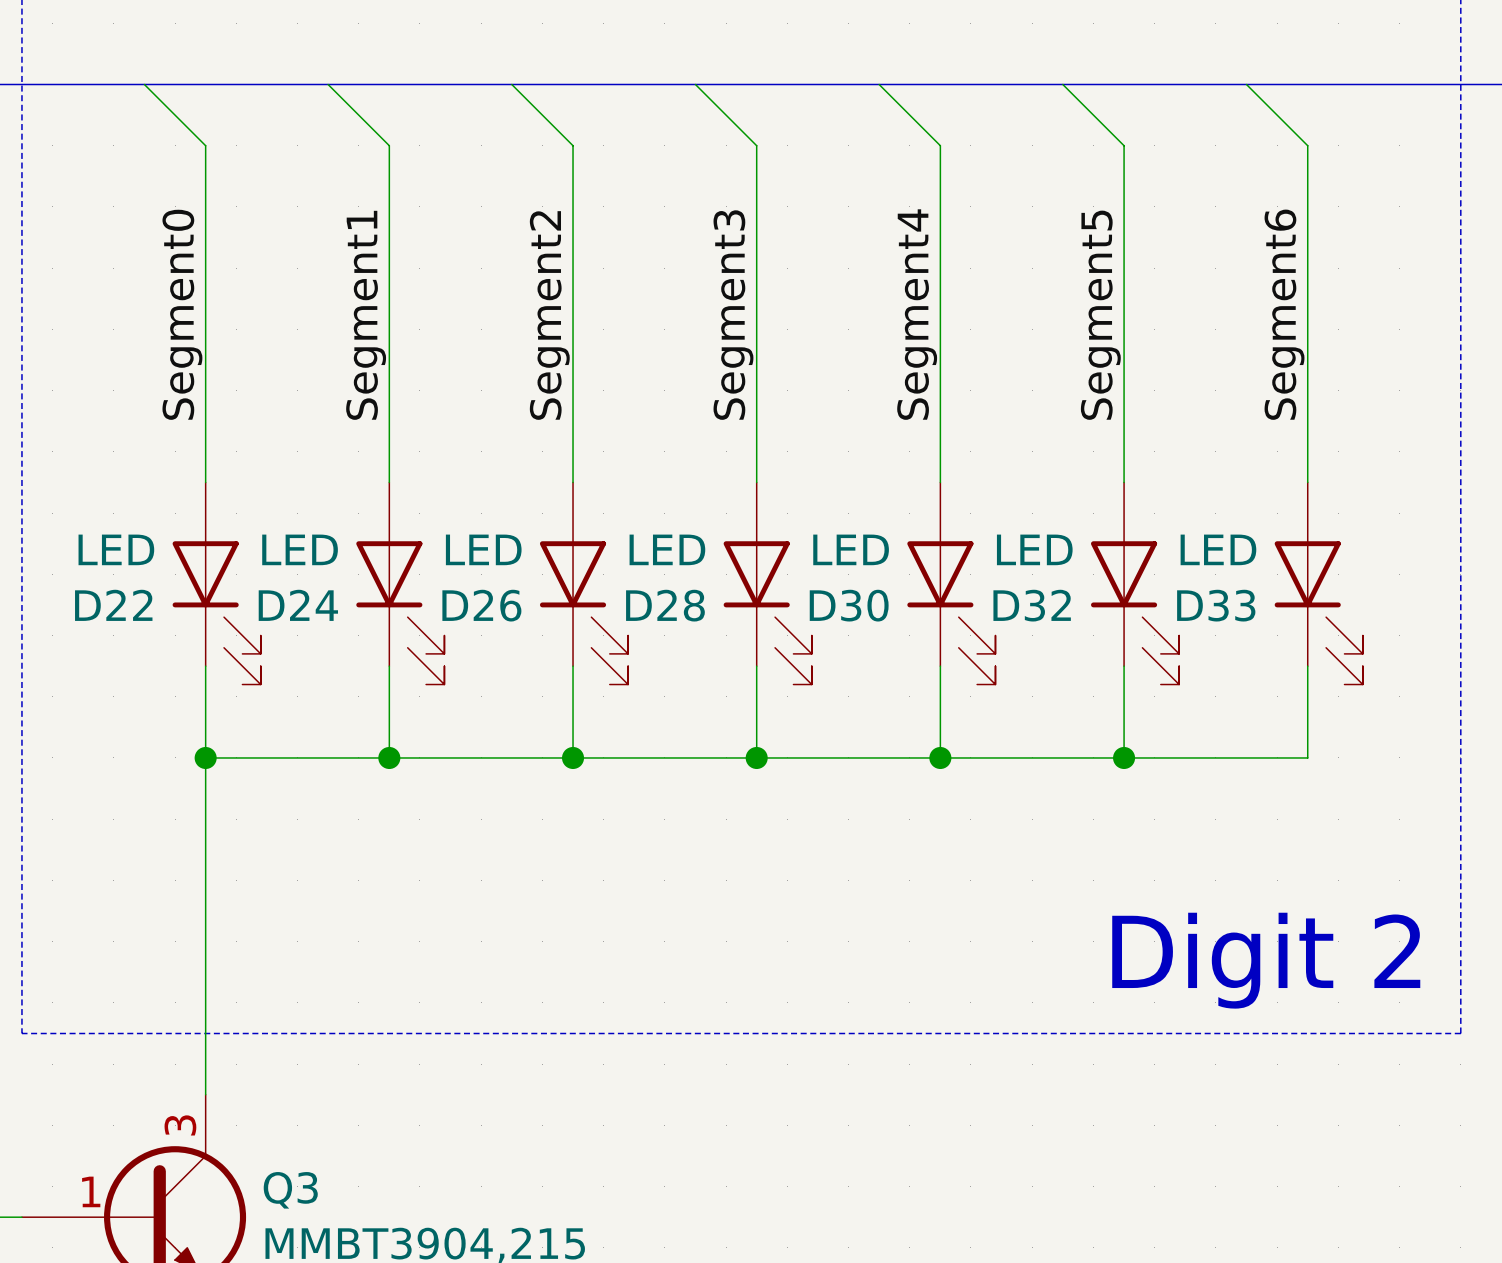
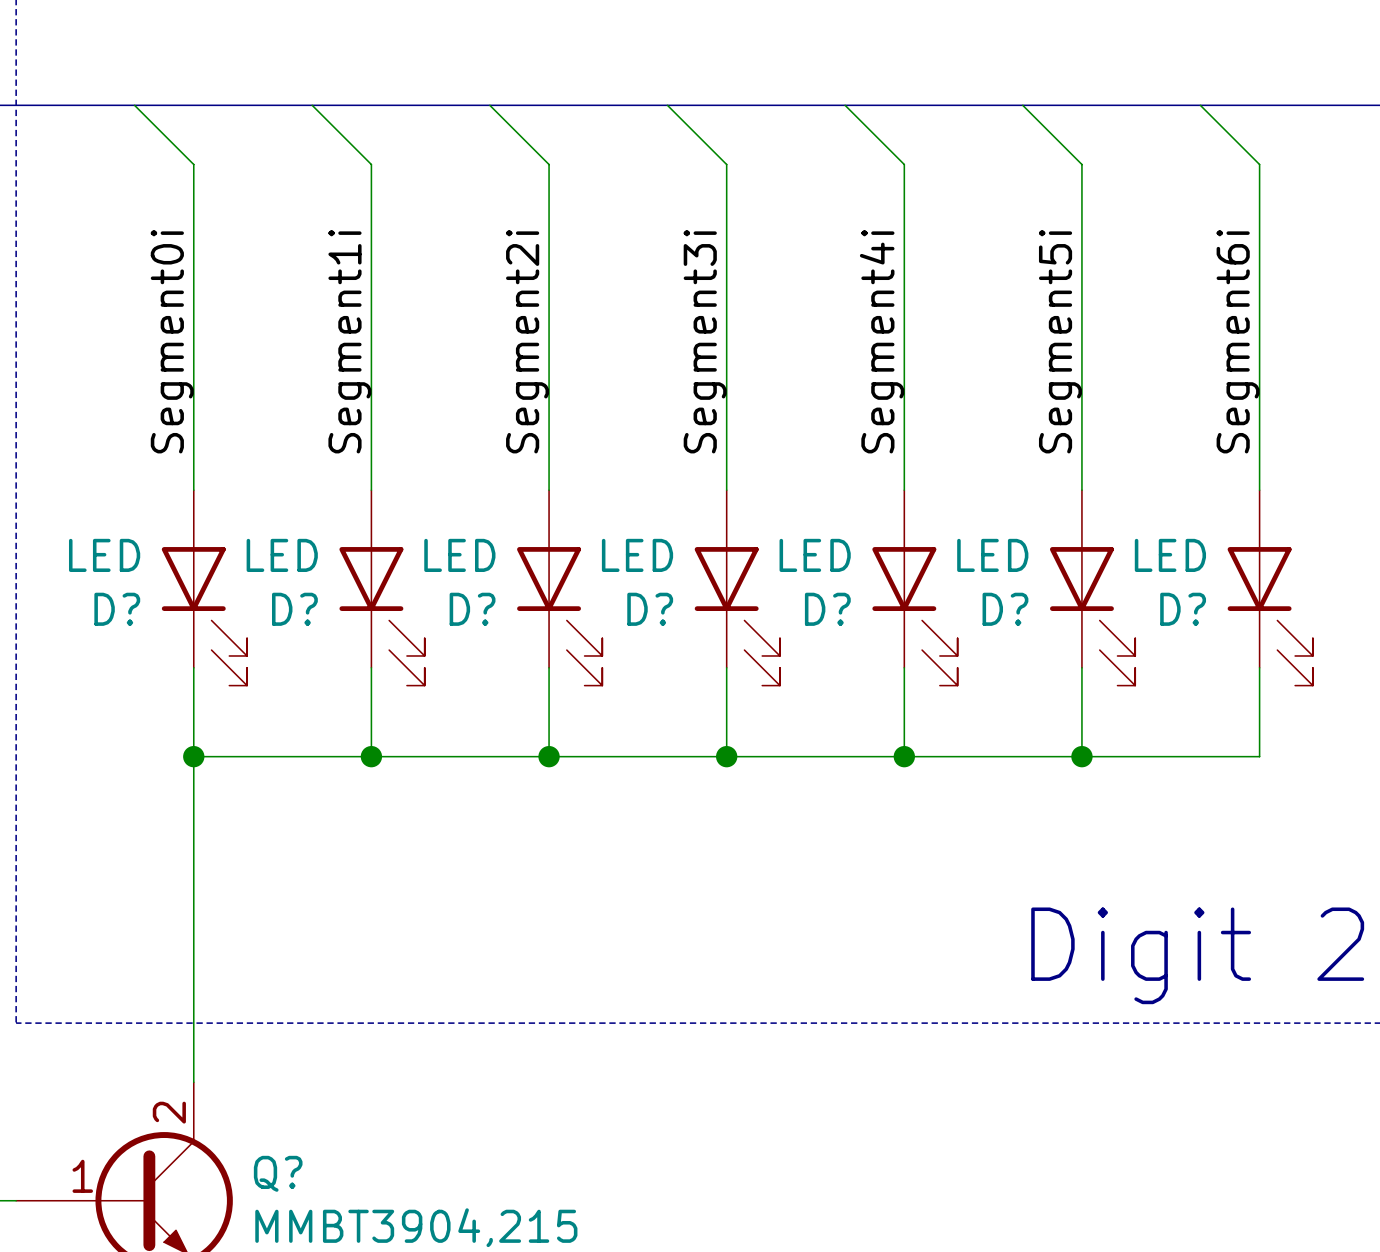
label: Segment0 (182, 314) -> Segment0i (172, 341)
label: Segment4 (917, 314) -> Segment4i (882, 341)
label: Segment6 (1284, 314) -> Segment6i (1238, 341)
label: Segment1 (366, 315) -> Segment1i (349, 341)
label: Segment2 (549, 315) -> Segment2i (527, 341)
label: Segment3 (733, 315) -> Segment3i (705, 341)
label: Segment5 (1100, 315) -> Segment5i (1060, 341)
D22 name: D22 (113, 605) -> D? (117, 609)
D24 name: D24 (298, 605) -> D? (294, 609)
D26 name: D26 (481, 605) -> D? (472, 609)
D28 name: D28 (665, 605) -> D? (650, 609)
D30 name: D30 (849, 605) -> D? (827, 609)
D32 name: D32 (1032, 605) -> D? (1005, 609)
D33 name: D33 (1216, 605) -> D? (1183, 609)
Q3 pin number: 3 (180, 1125) -> 2 (169, 1112)
Q3 name: Q3 (290, 1190) -> Q? (278, 1173)

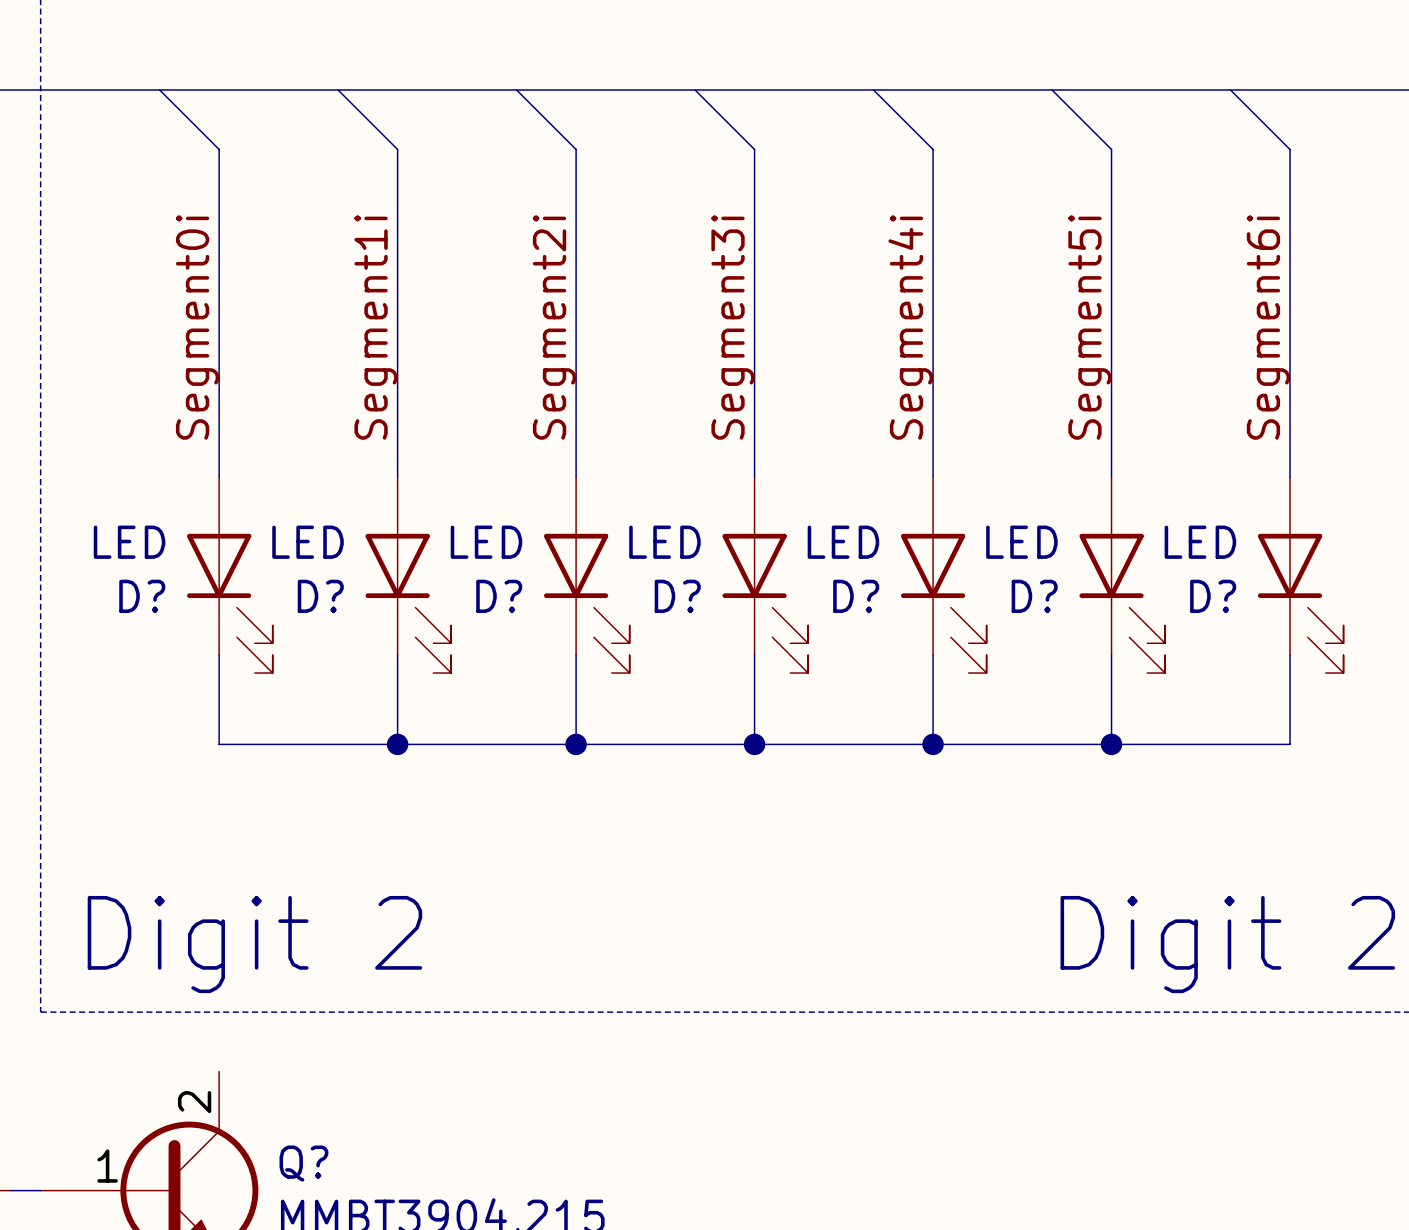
wire: (193, 756) (193, 1082) -> none
junction: (193, 756) -> none
text: none -> Digit 2 (254, 944)

